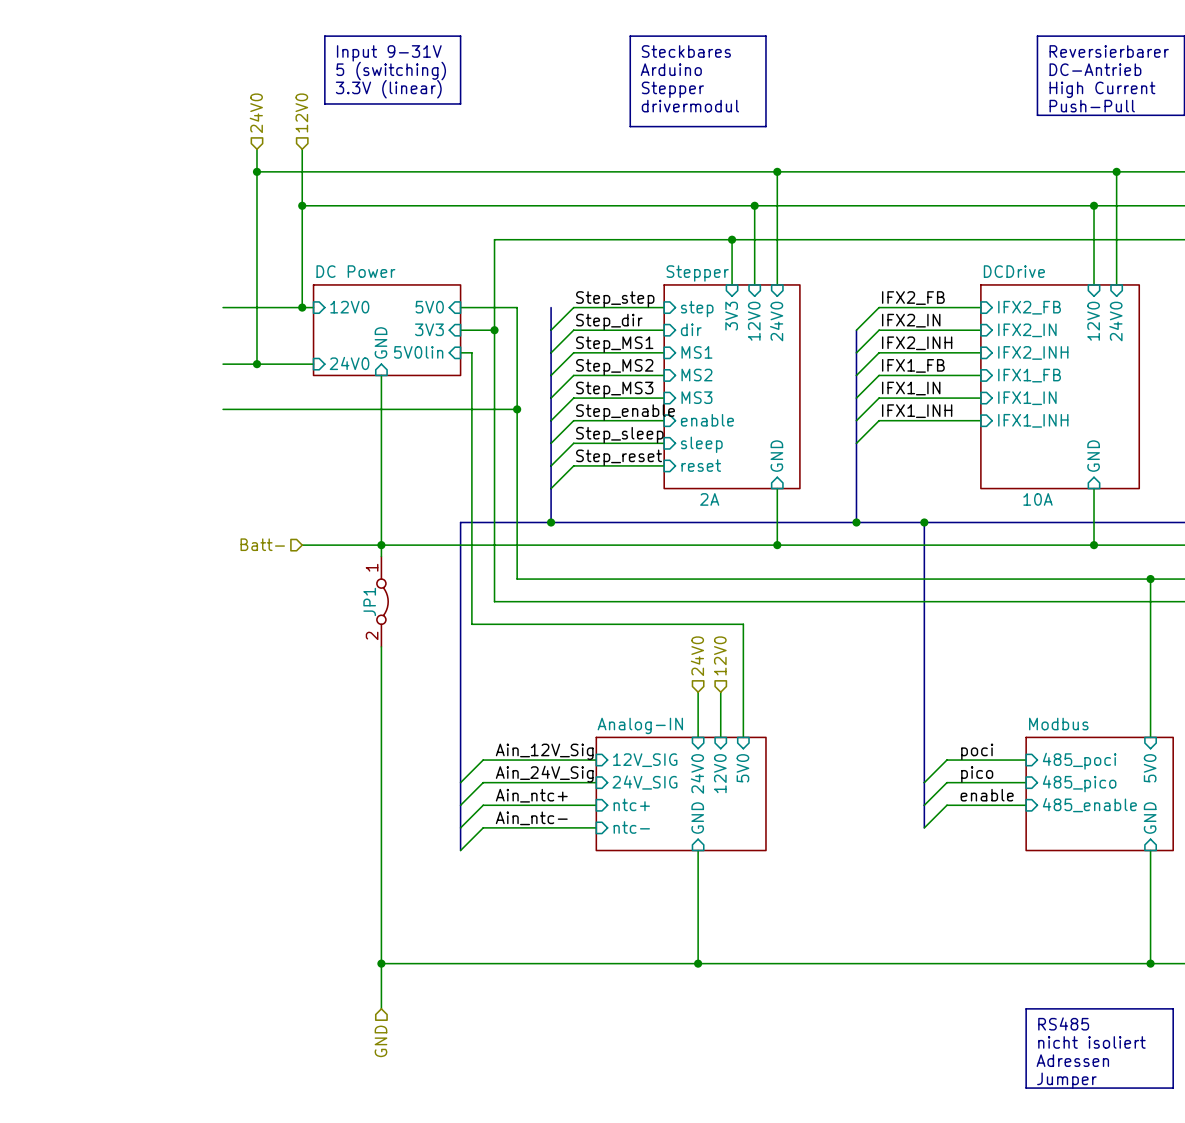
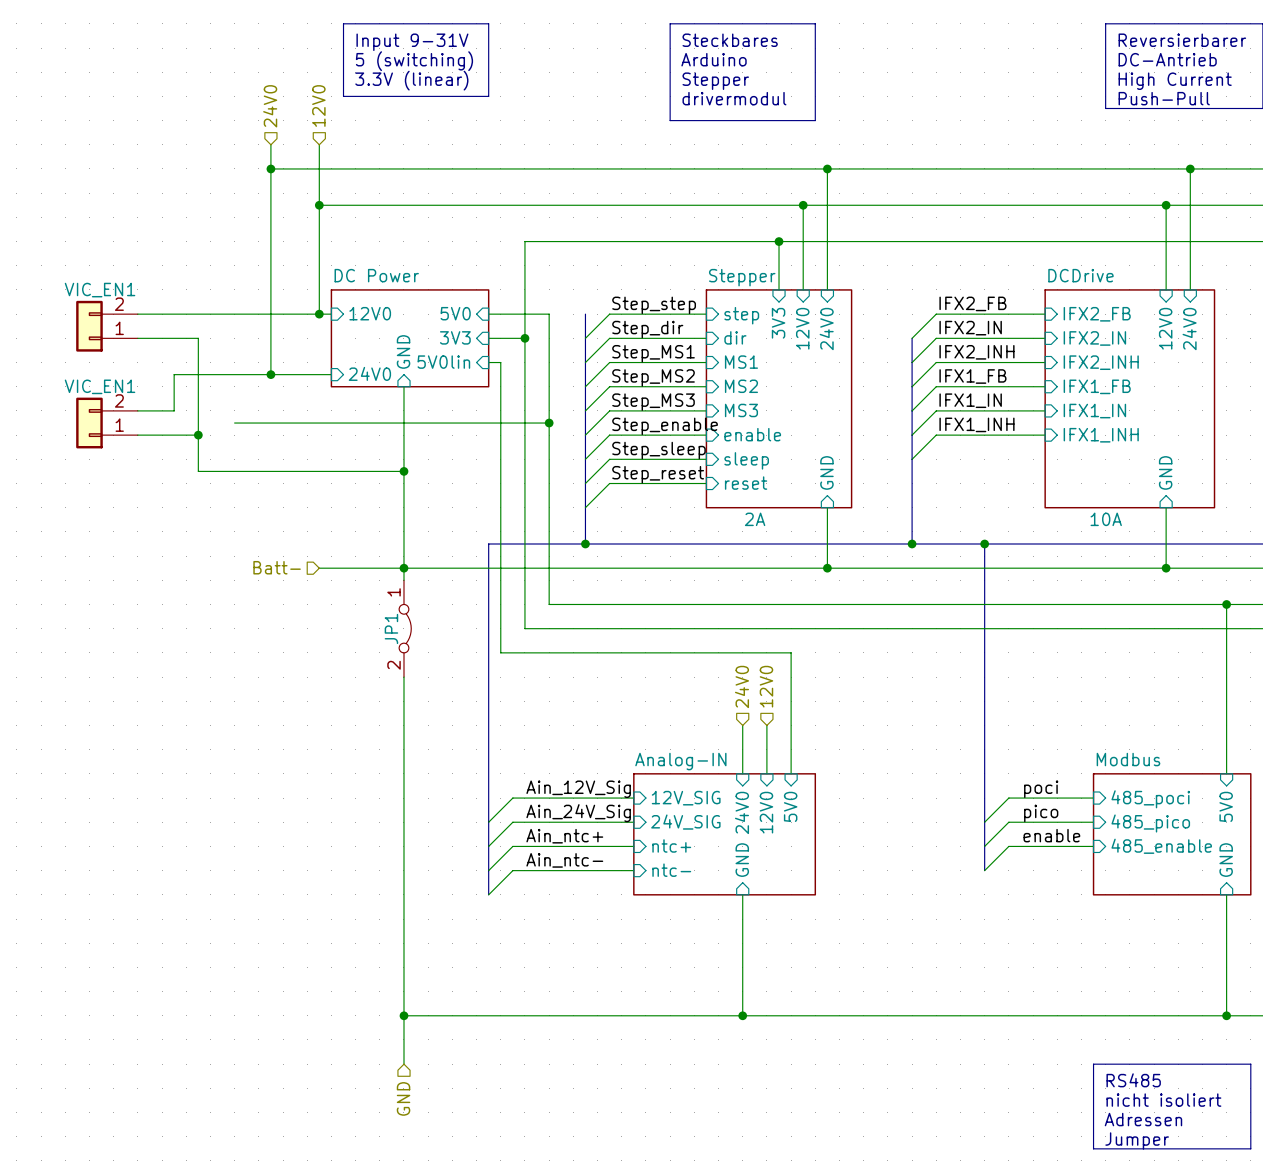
wire: none -> (137, 314) (234, 314)
VIC_EN1: none -> (107, 326)
wire: none -> (137, 338) (198, 338) (198, 471) (403, 471)
wire: none -> (234, 374) (174, 374) (174, 410) (137, 410)
VIC_EN1: none -> (107, 423)
wire: none -> (137, 435) (198, 435)
junction: none -> (198, 435)
junction: none -> (403, 471)

